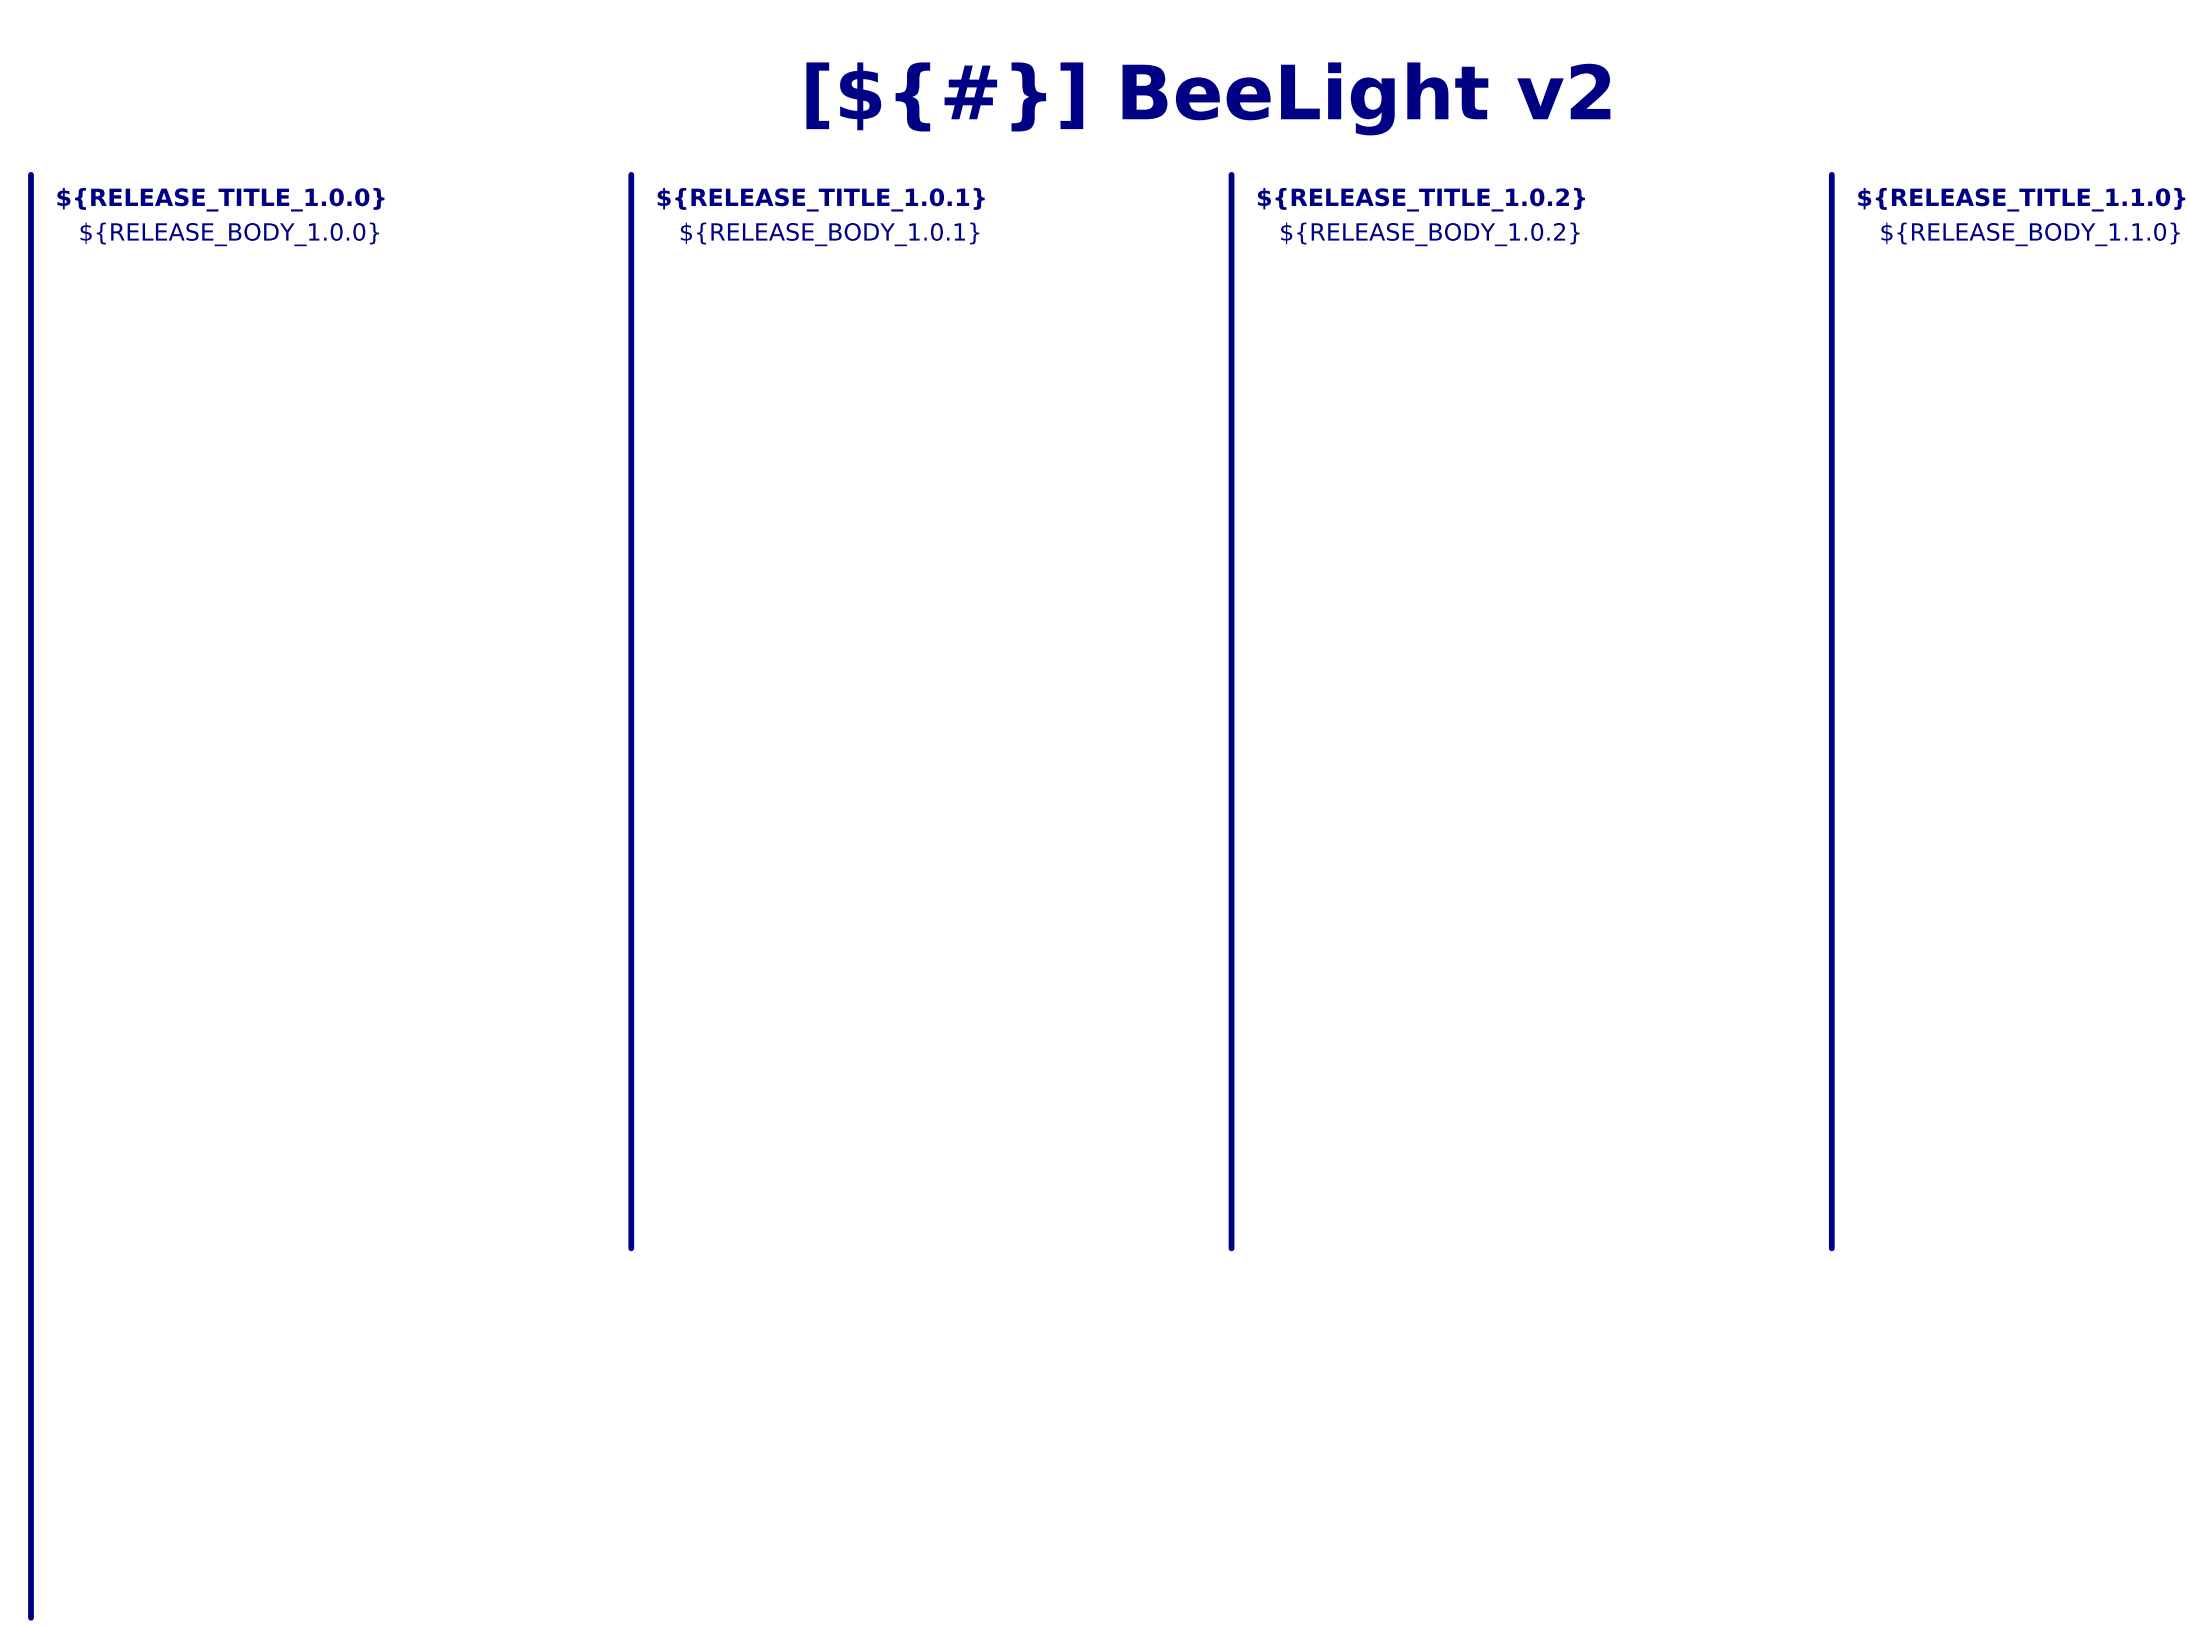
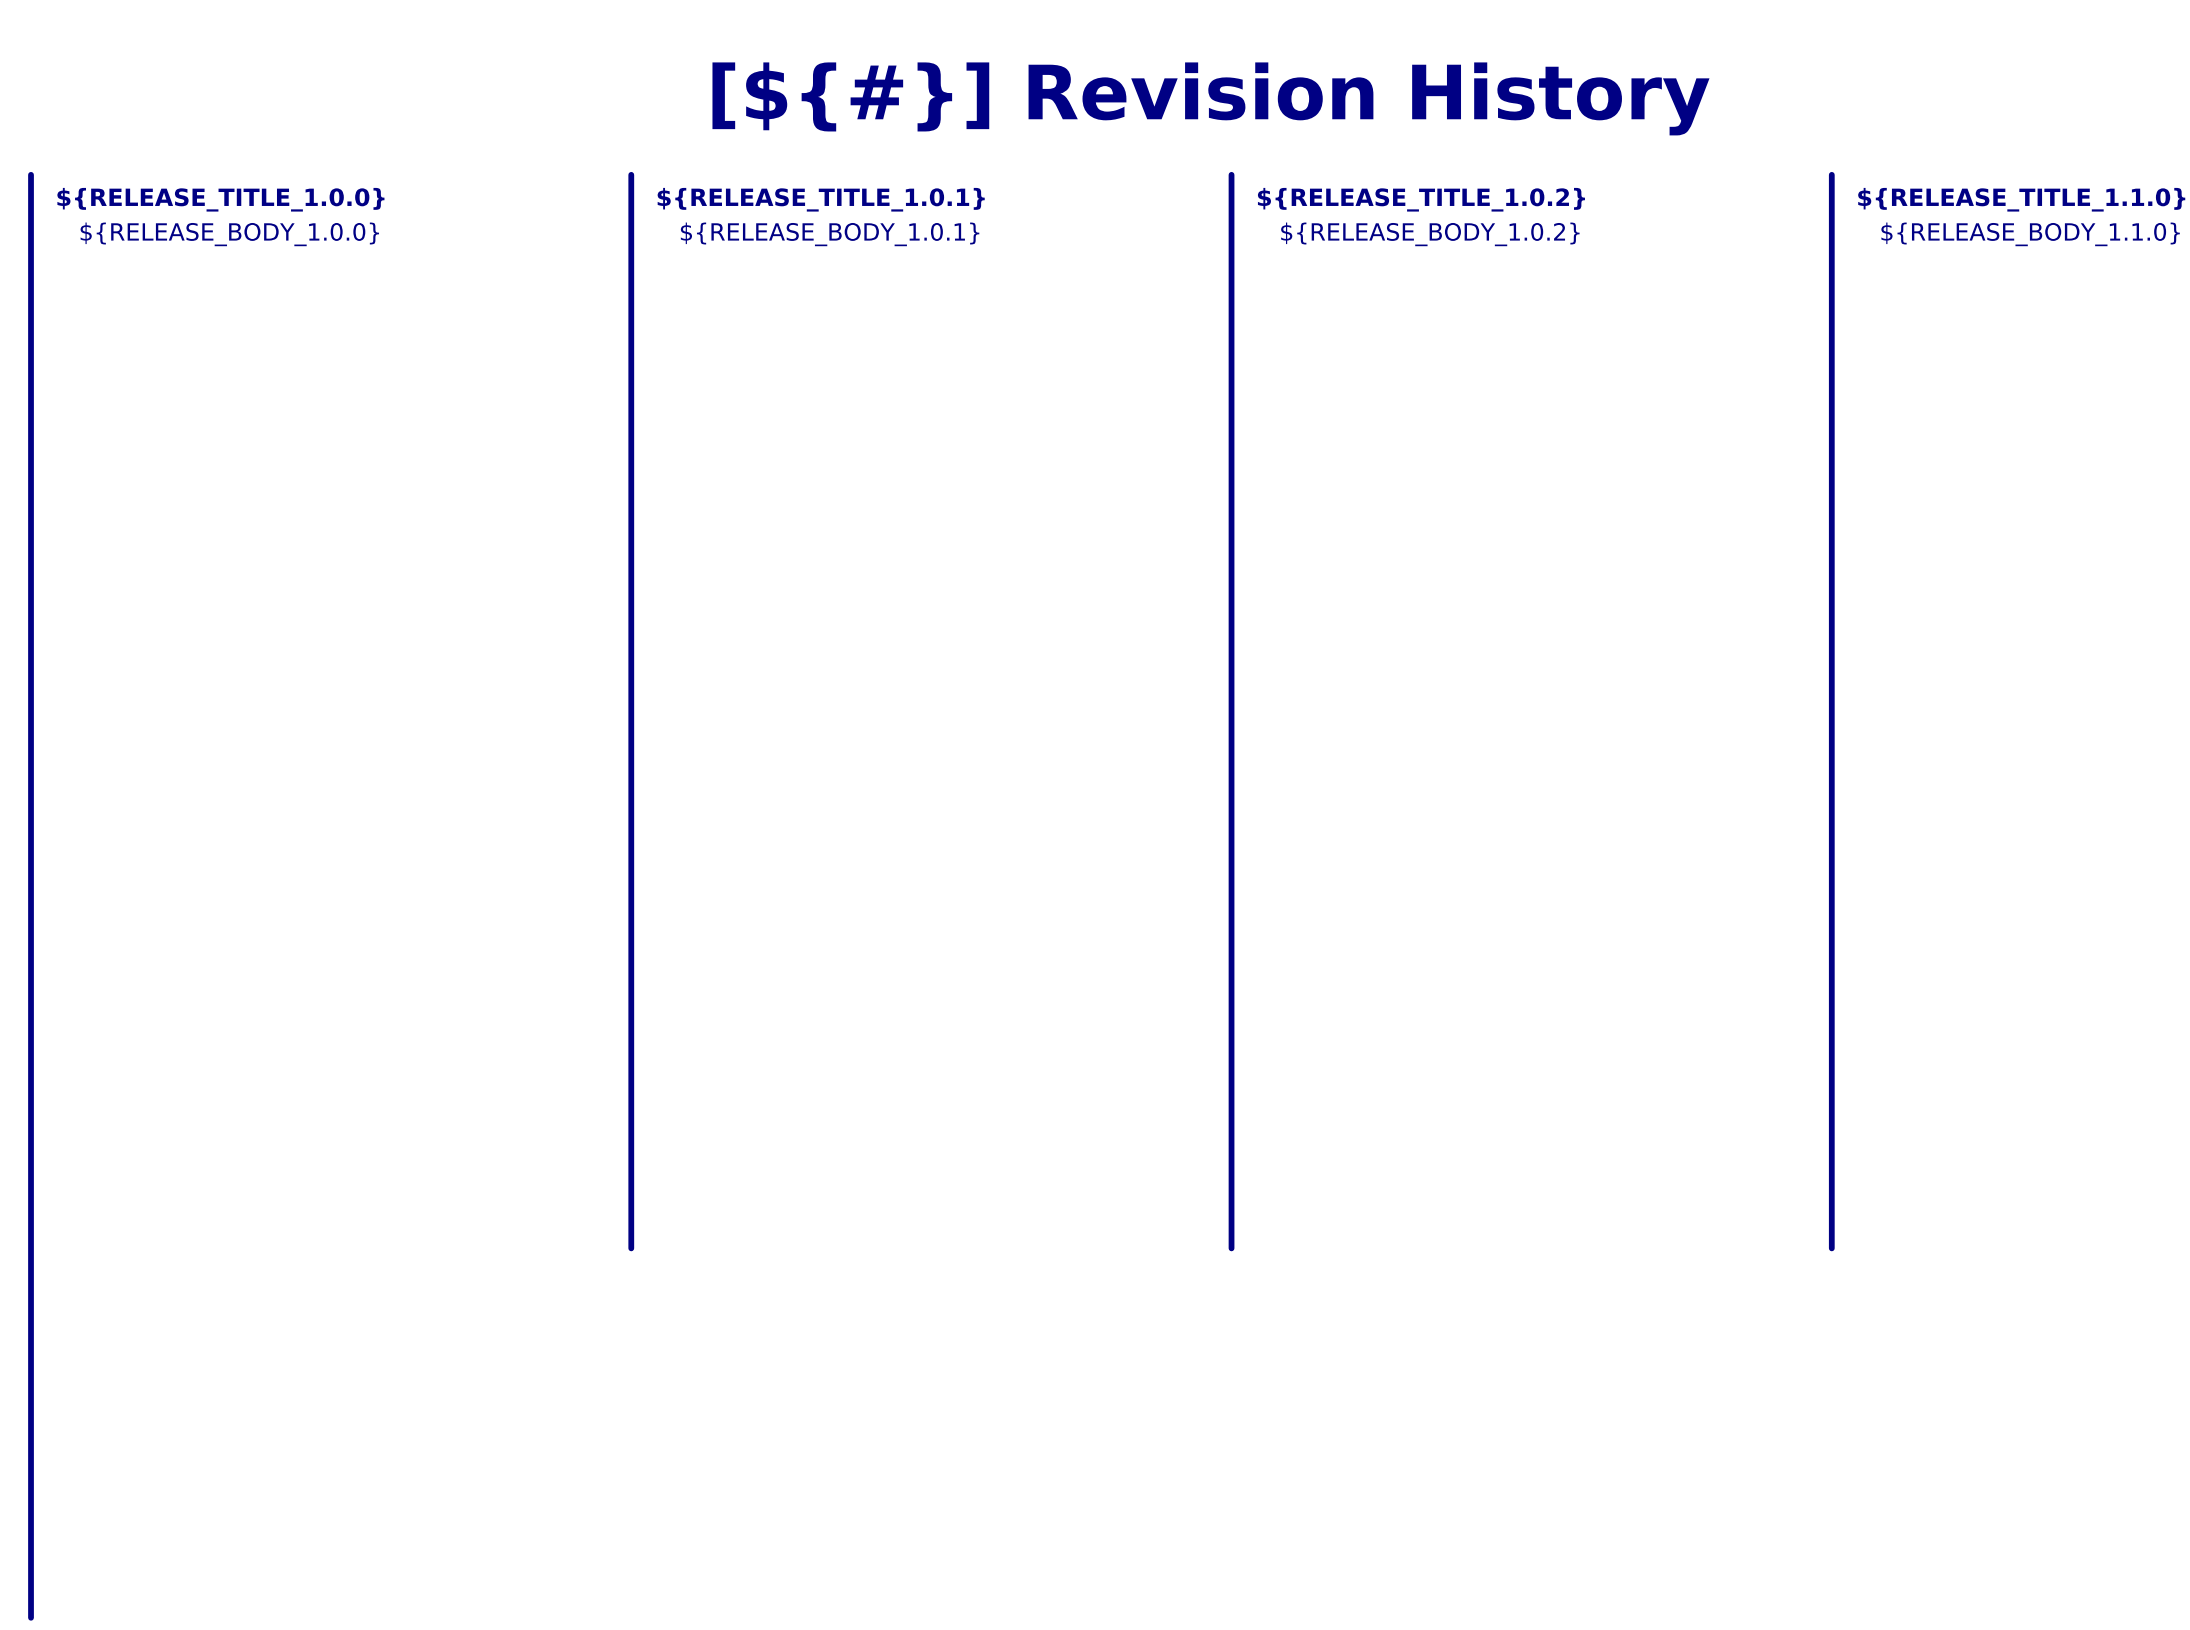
text: [${#}] BeeLight v2 (1208, 98) -> [${#}] Revision History (1210, 98)

